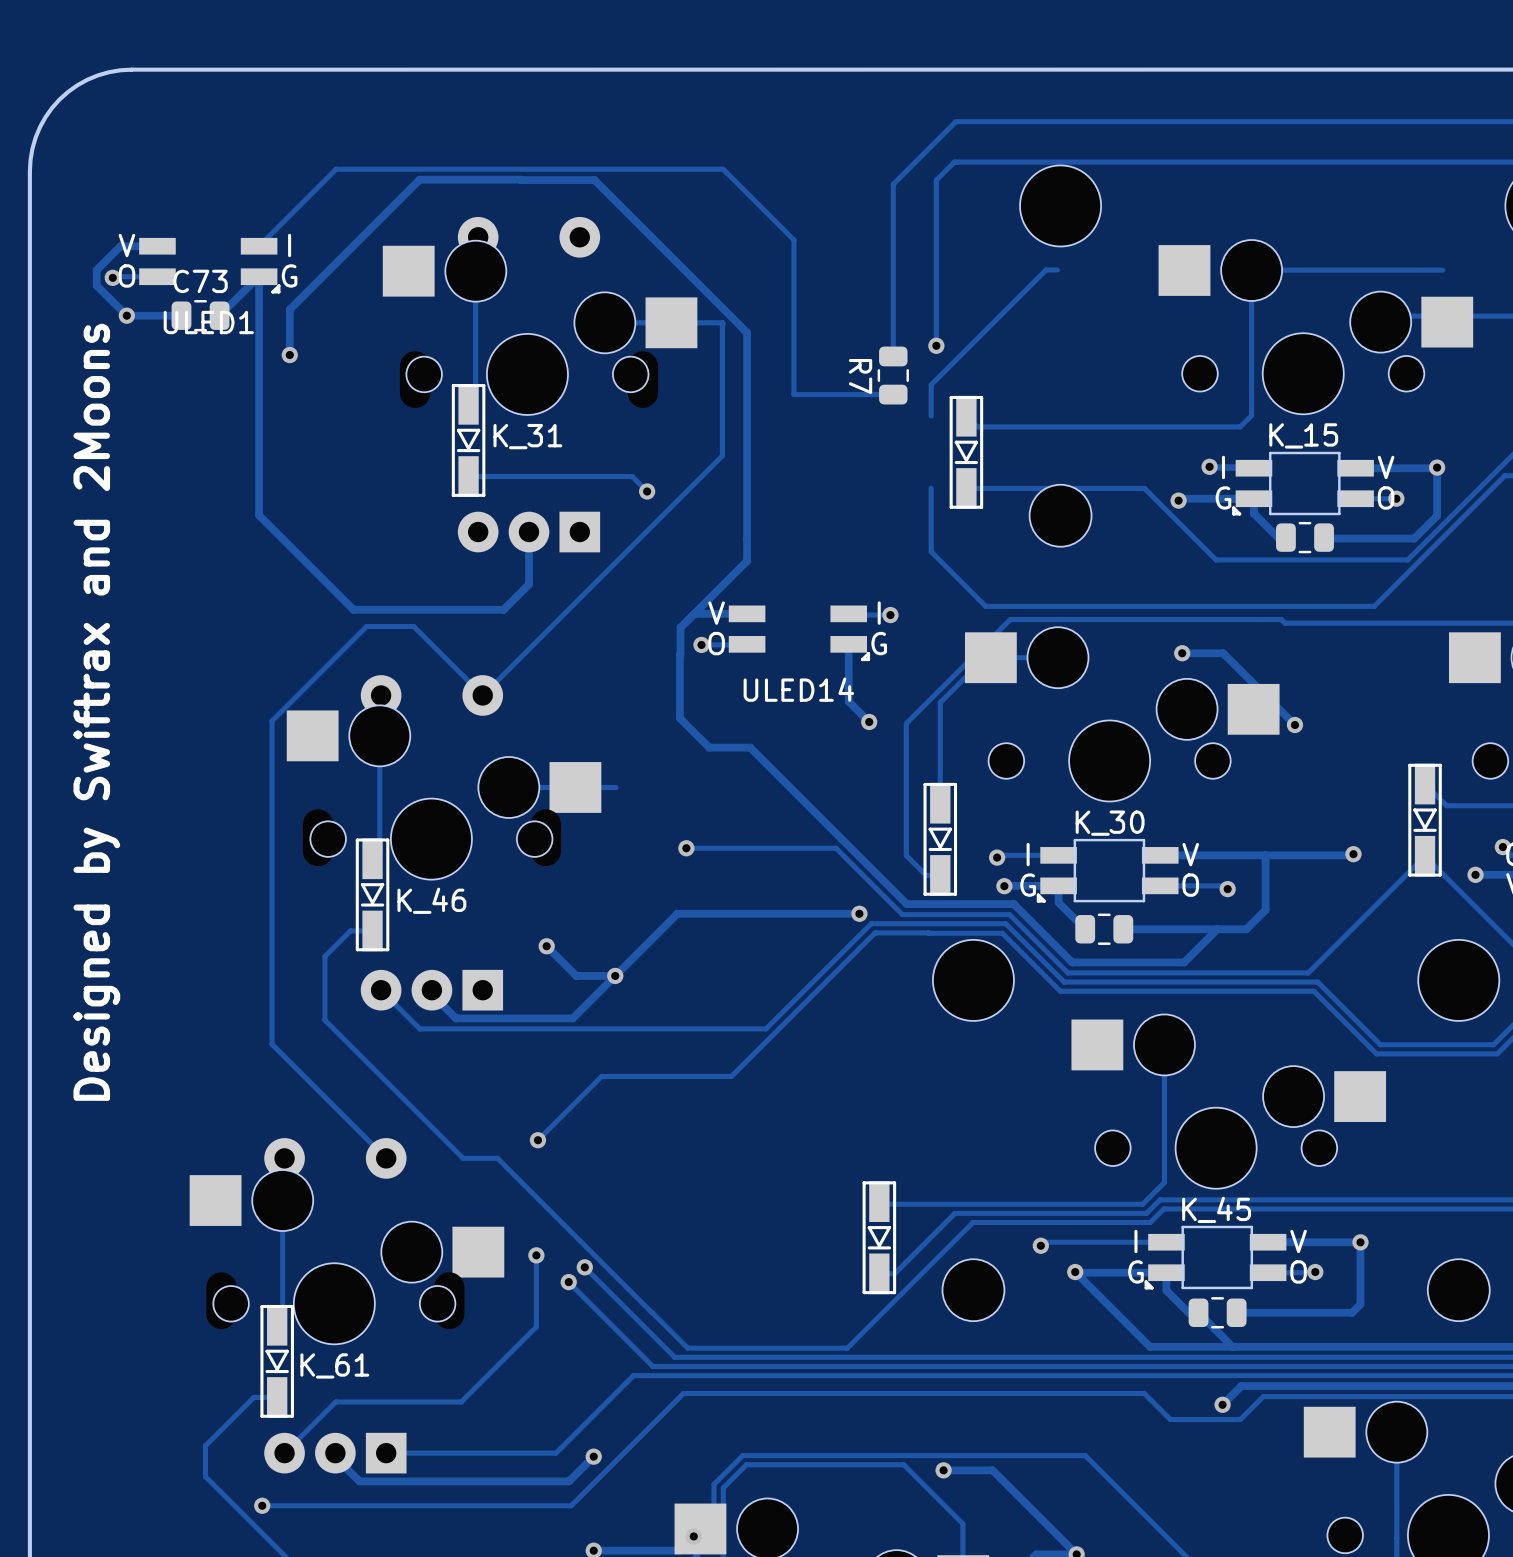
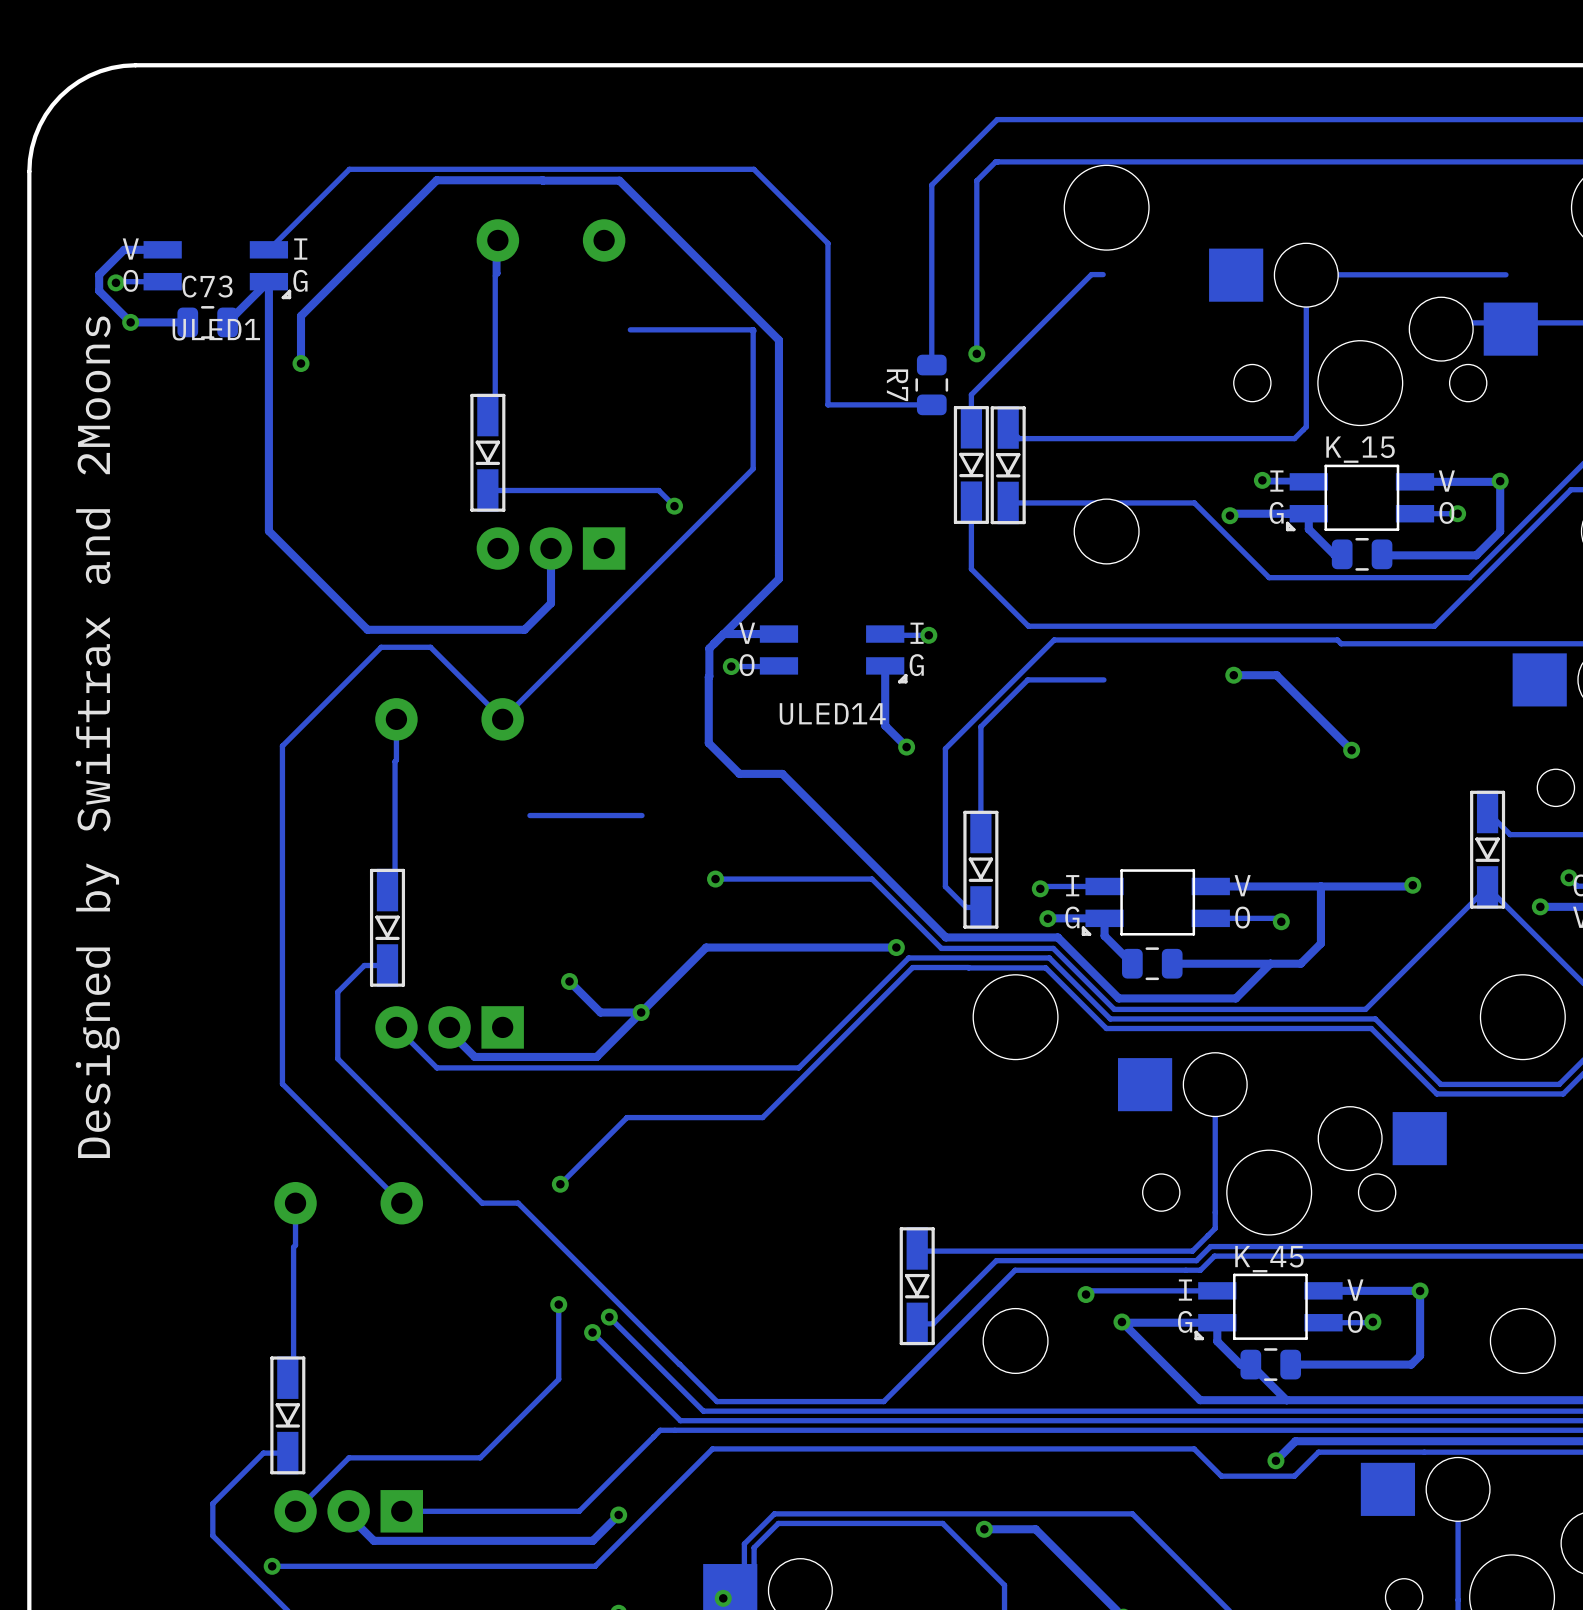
K_31: (540, 327) -> none
part: none -> (971, 464)
K_30: (1122, 714) -> none
K_46: (444, 792) -> none
K_61: (346, 1257) -> none

